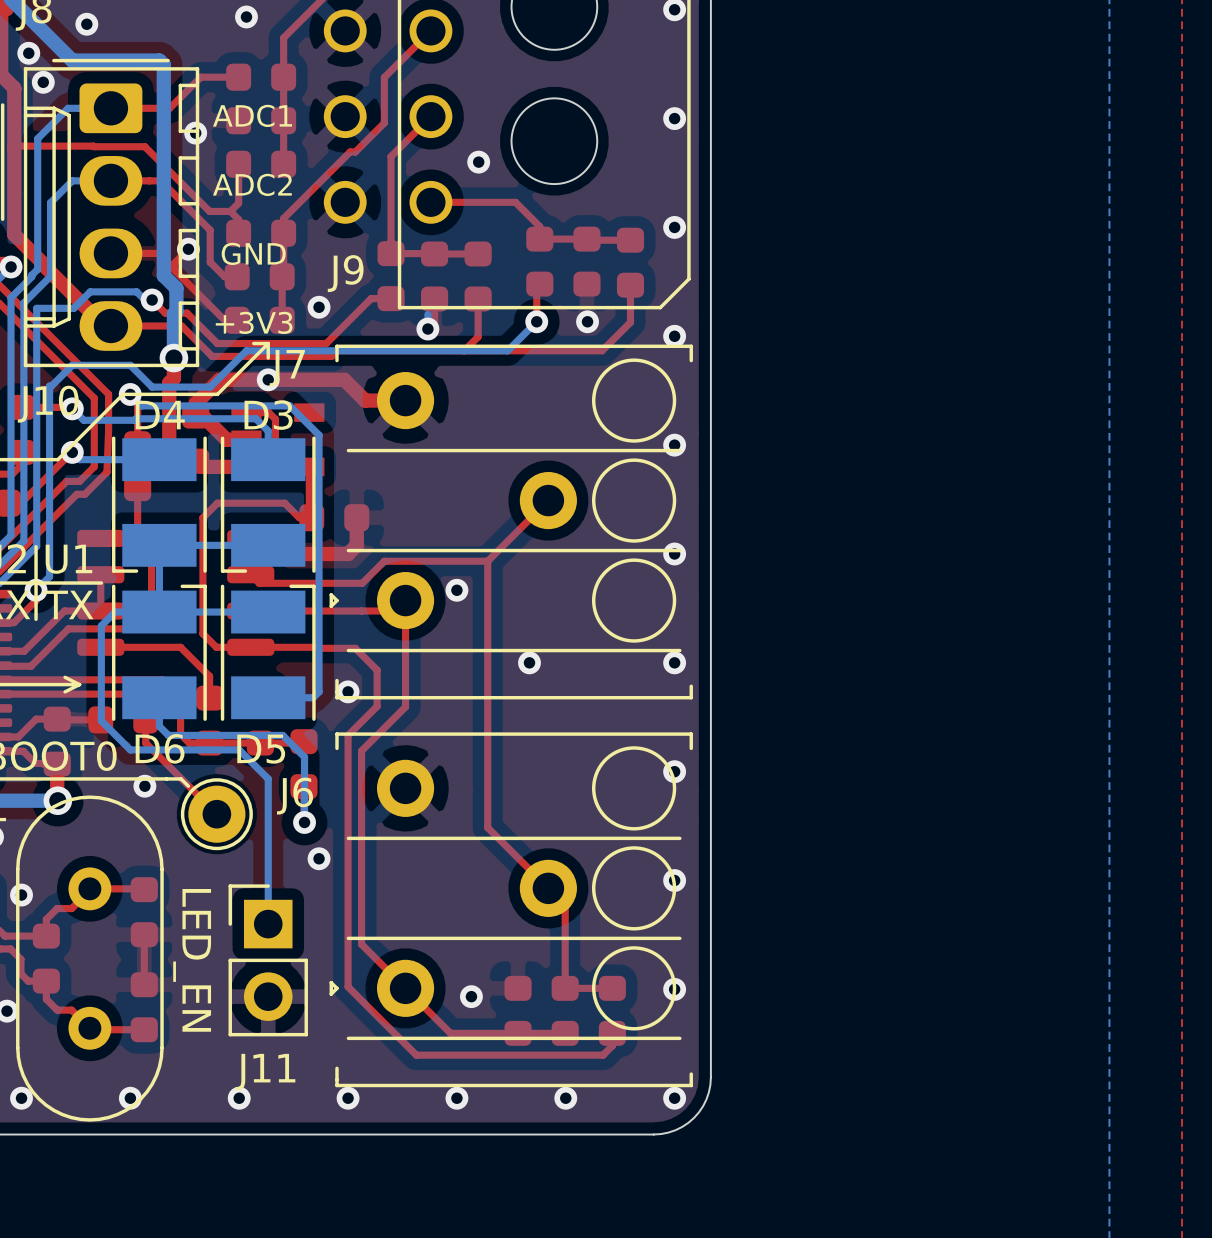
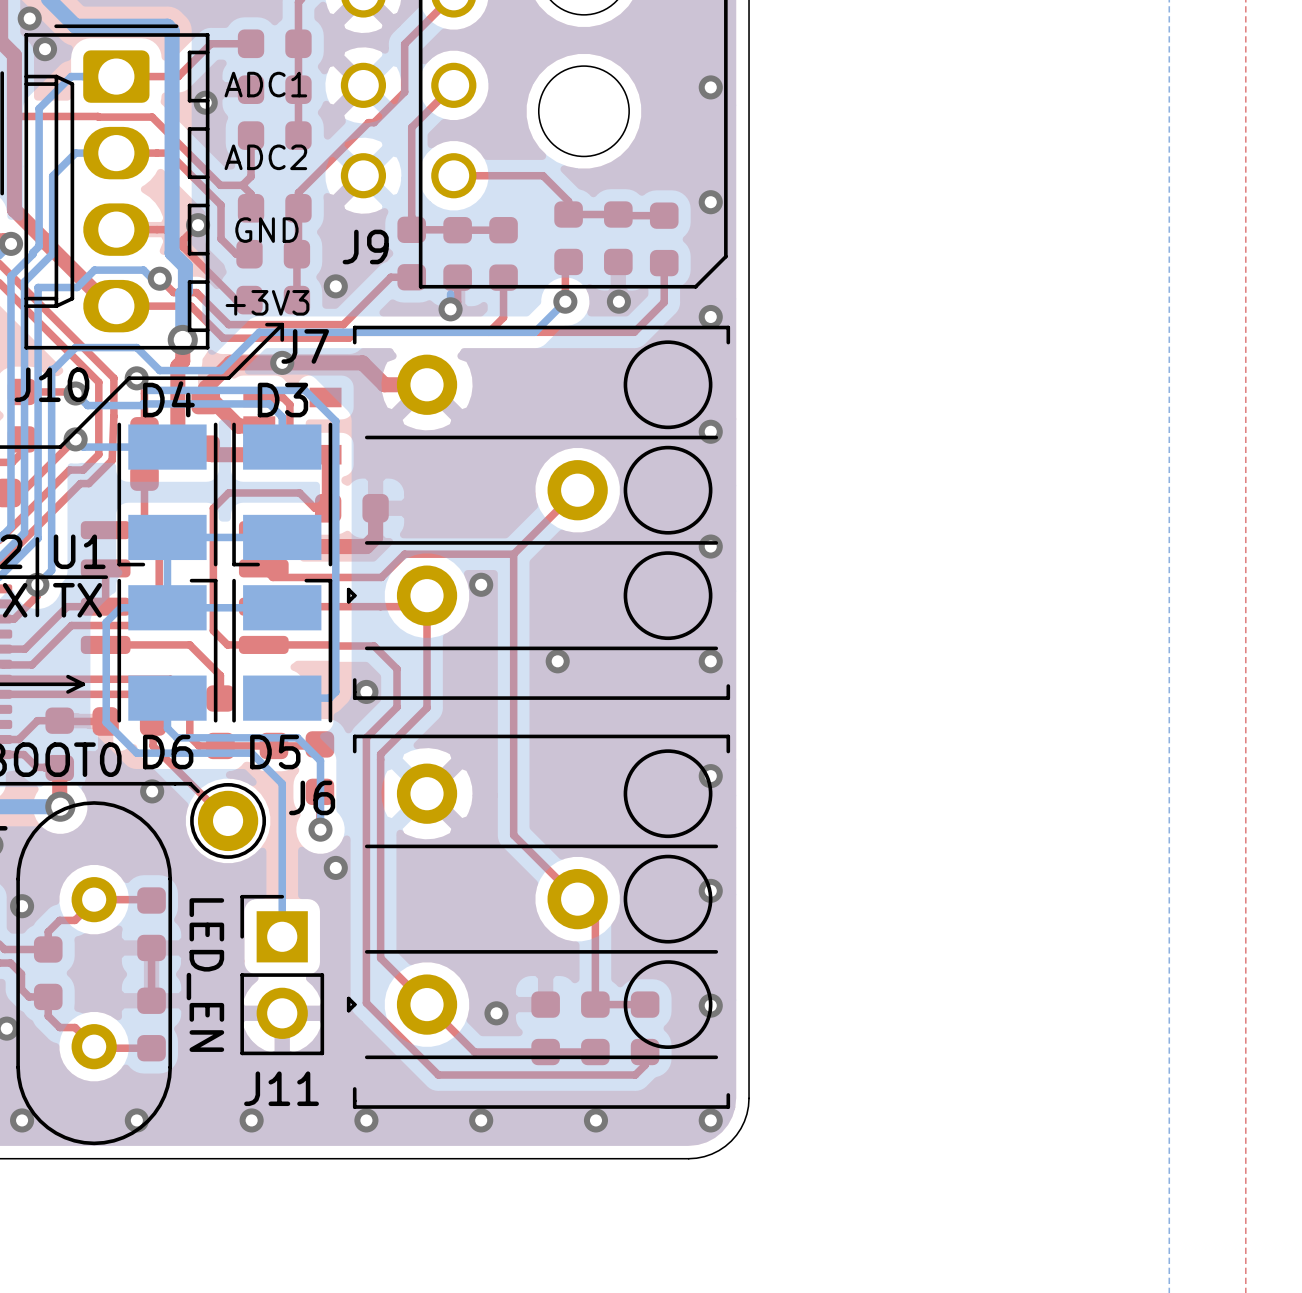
via: (478, 162) -> none

